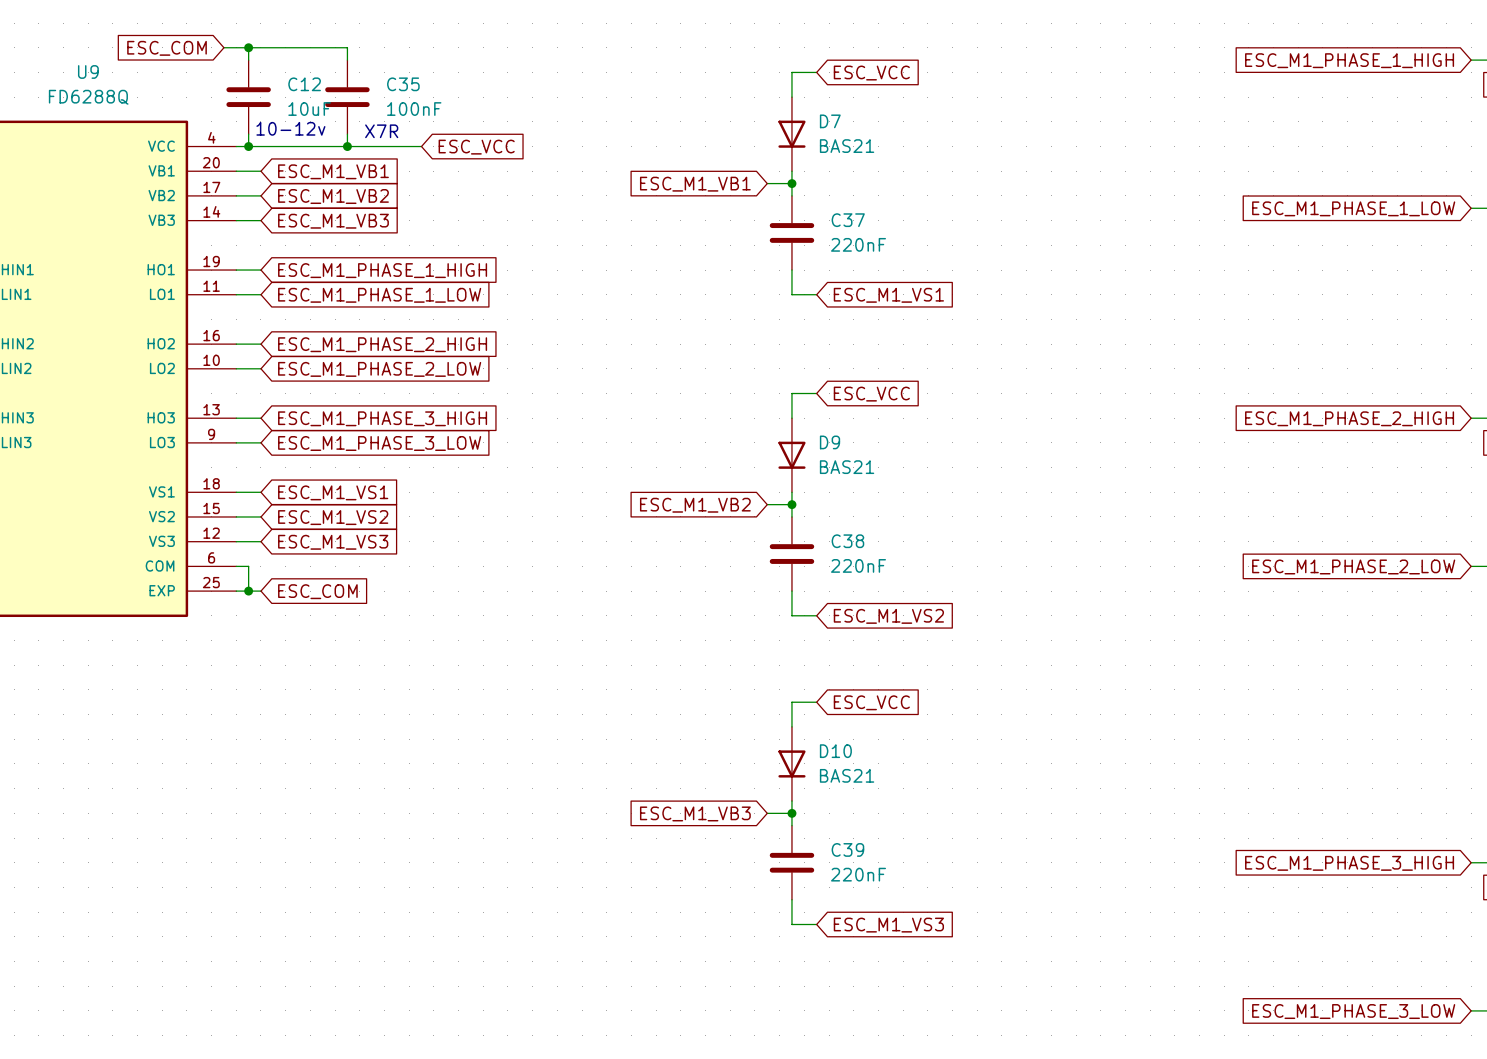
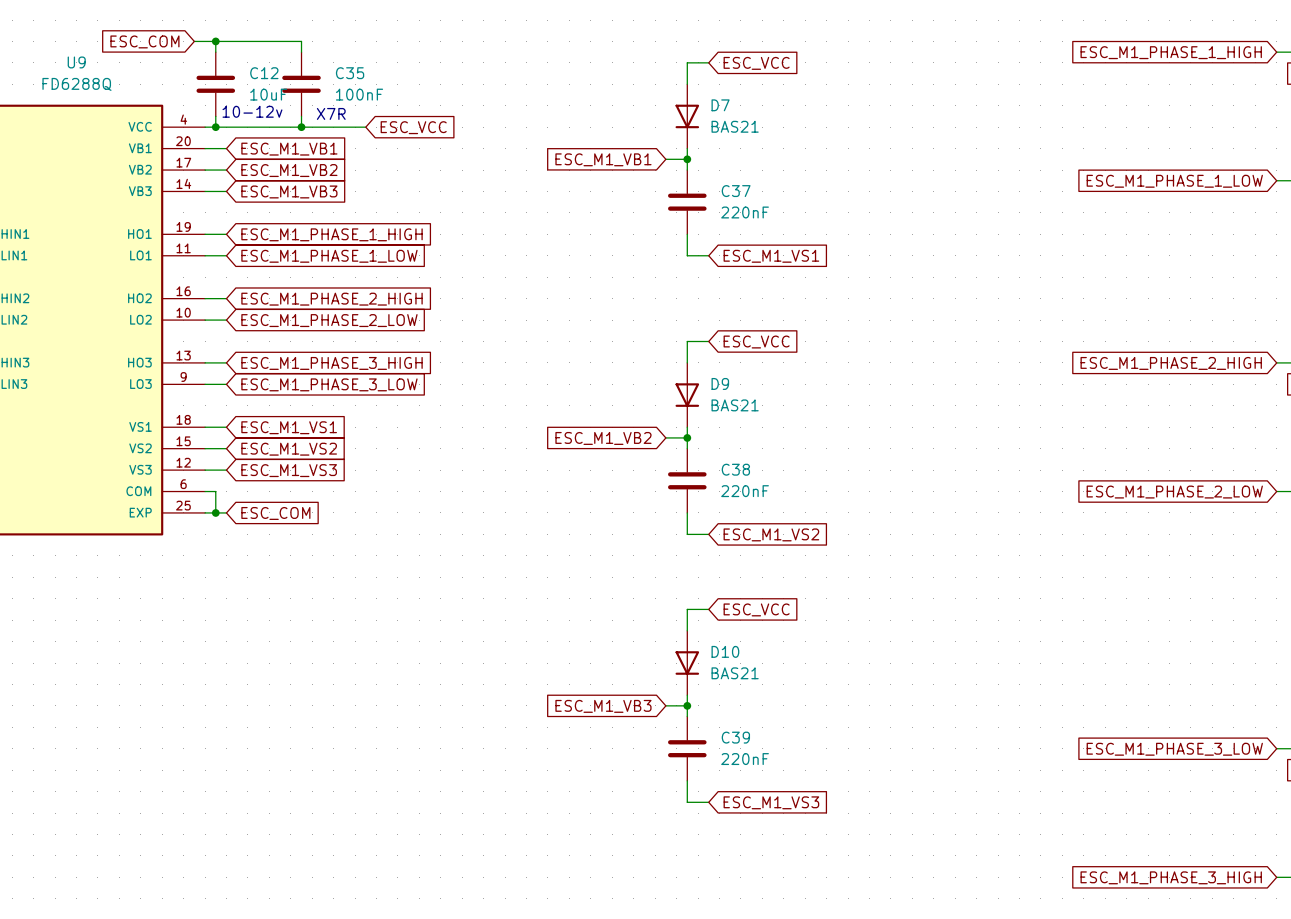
global label: ESC_M1_PHASE_3_HIGH (1349, 863) -> ESC_M1_PHASE_3_LOW (1174, 749)
global label: ESC_M1_PHASE_3_LOW (1353, 1011) -> ESC_M1_PHASE_3_HIGH (1171, 877)

